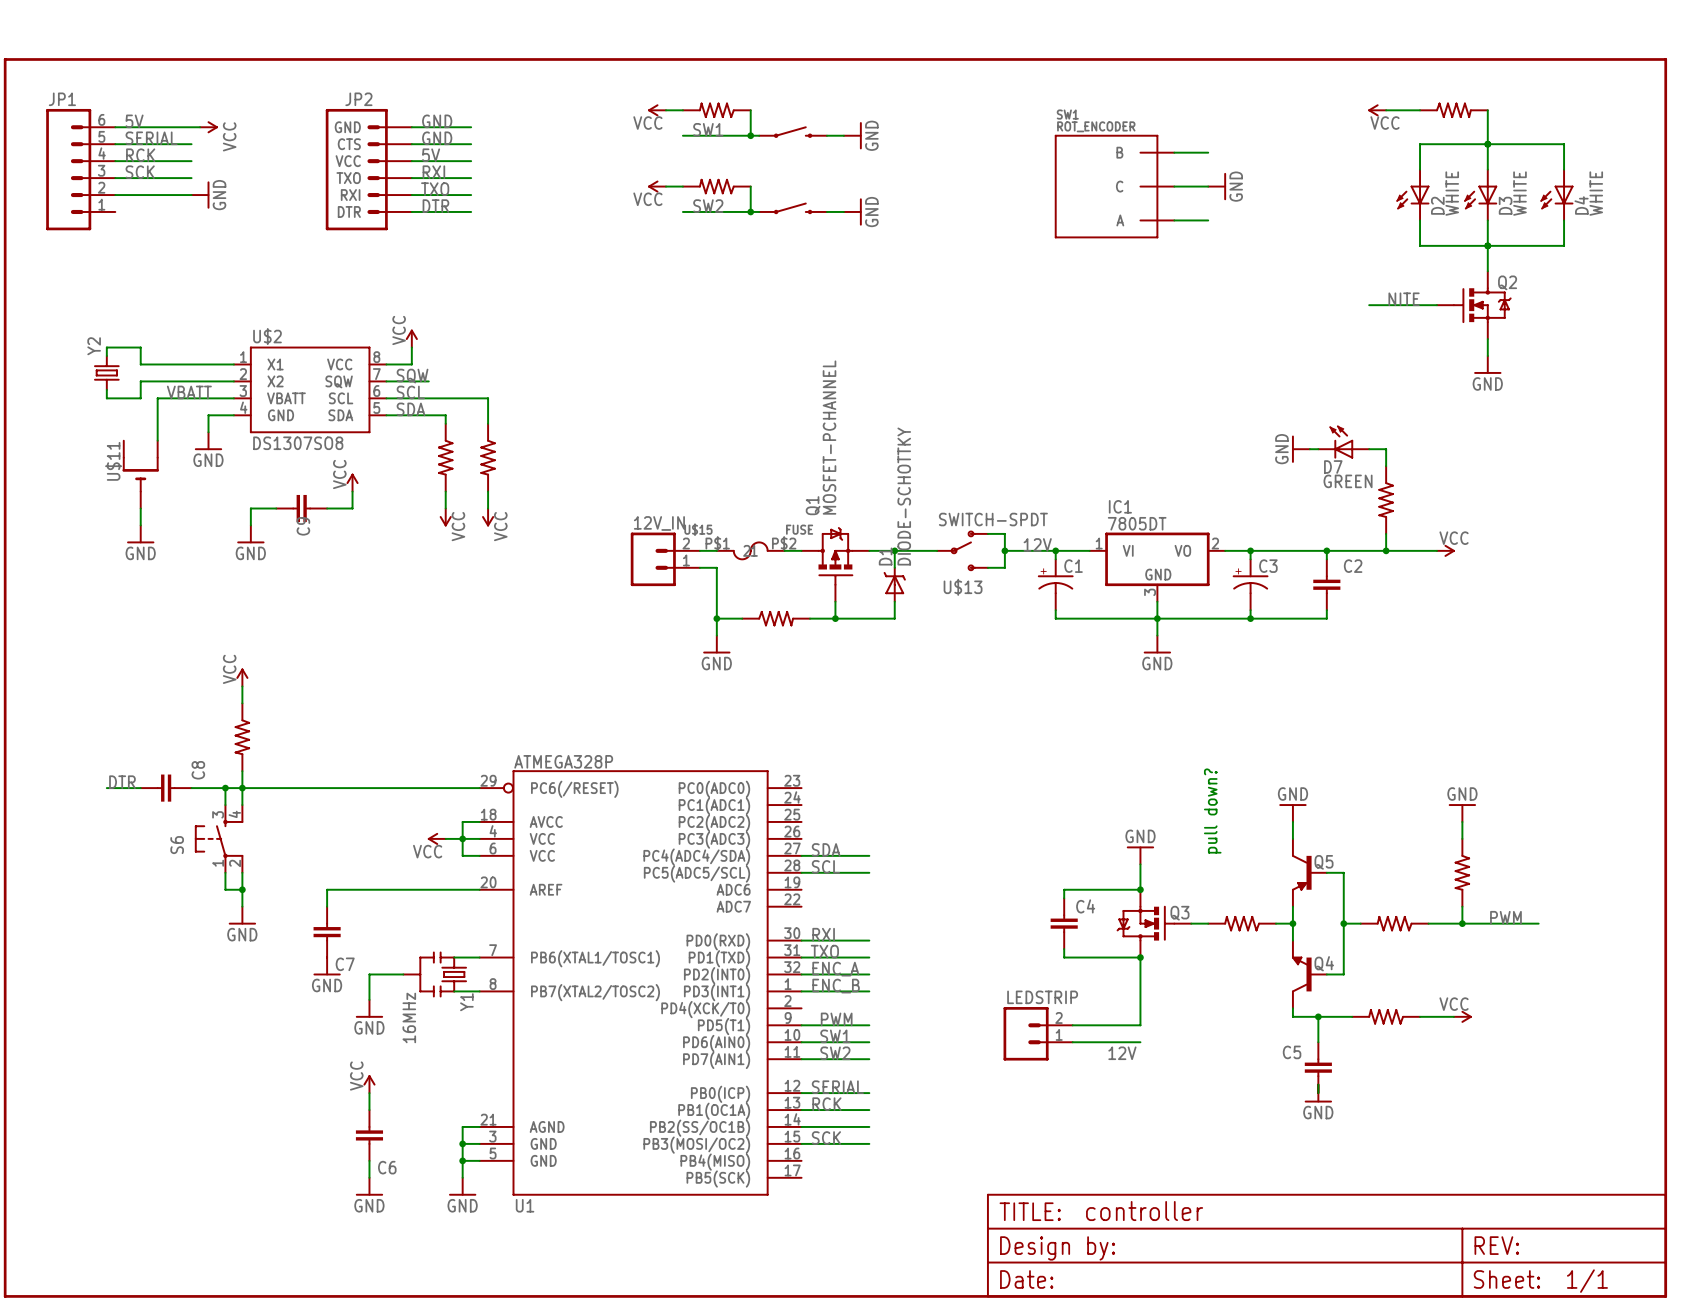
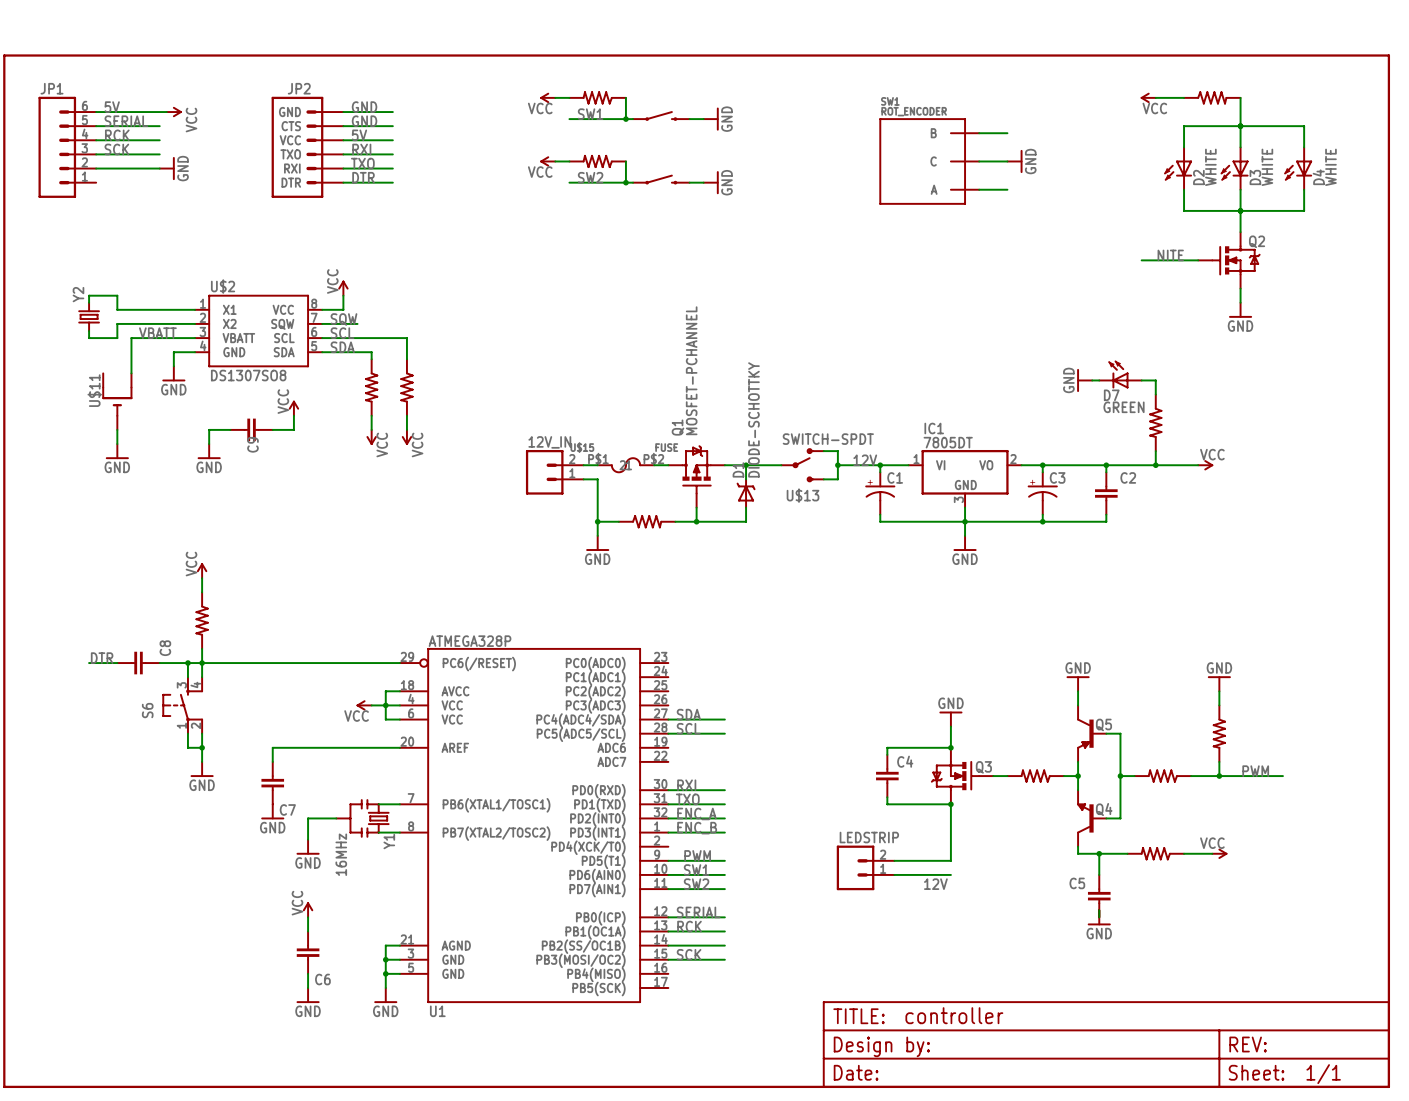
text: pull down? (1212, 811) -> none

